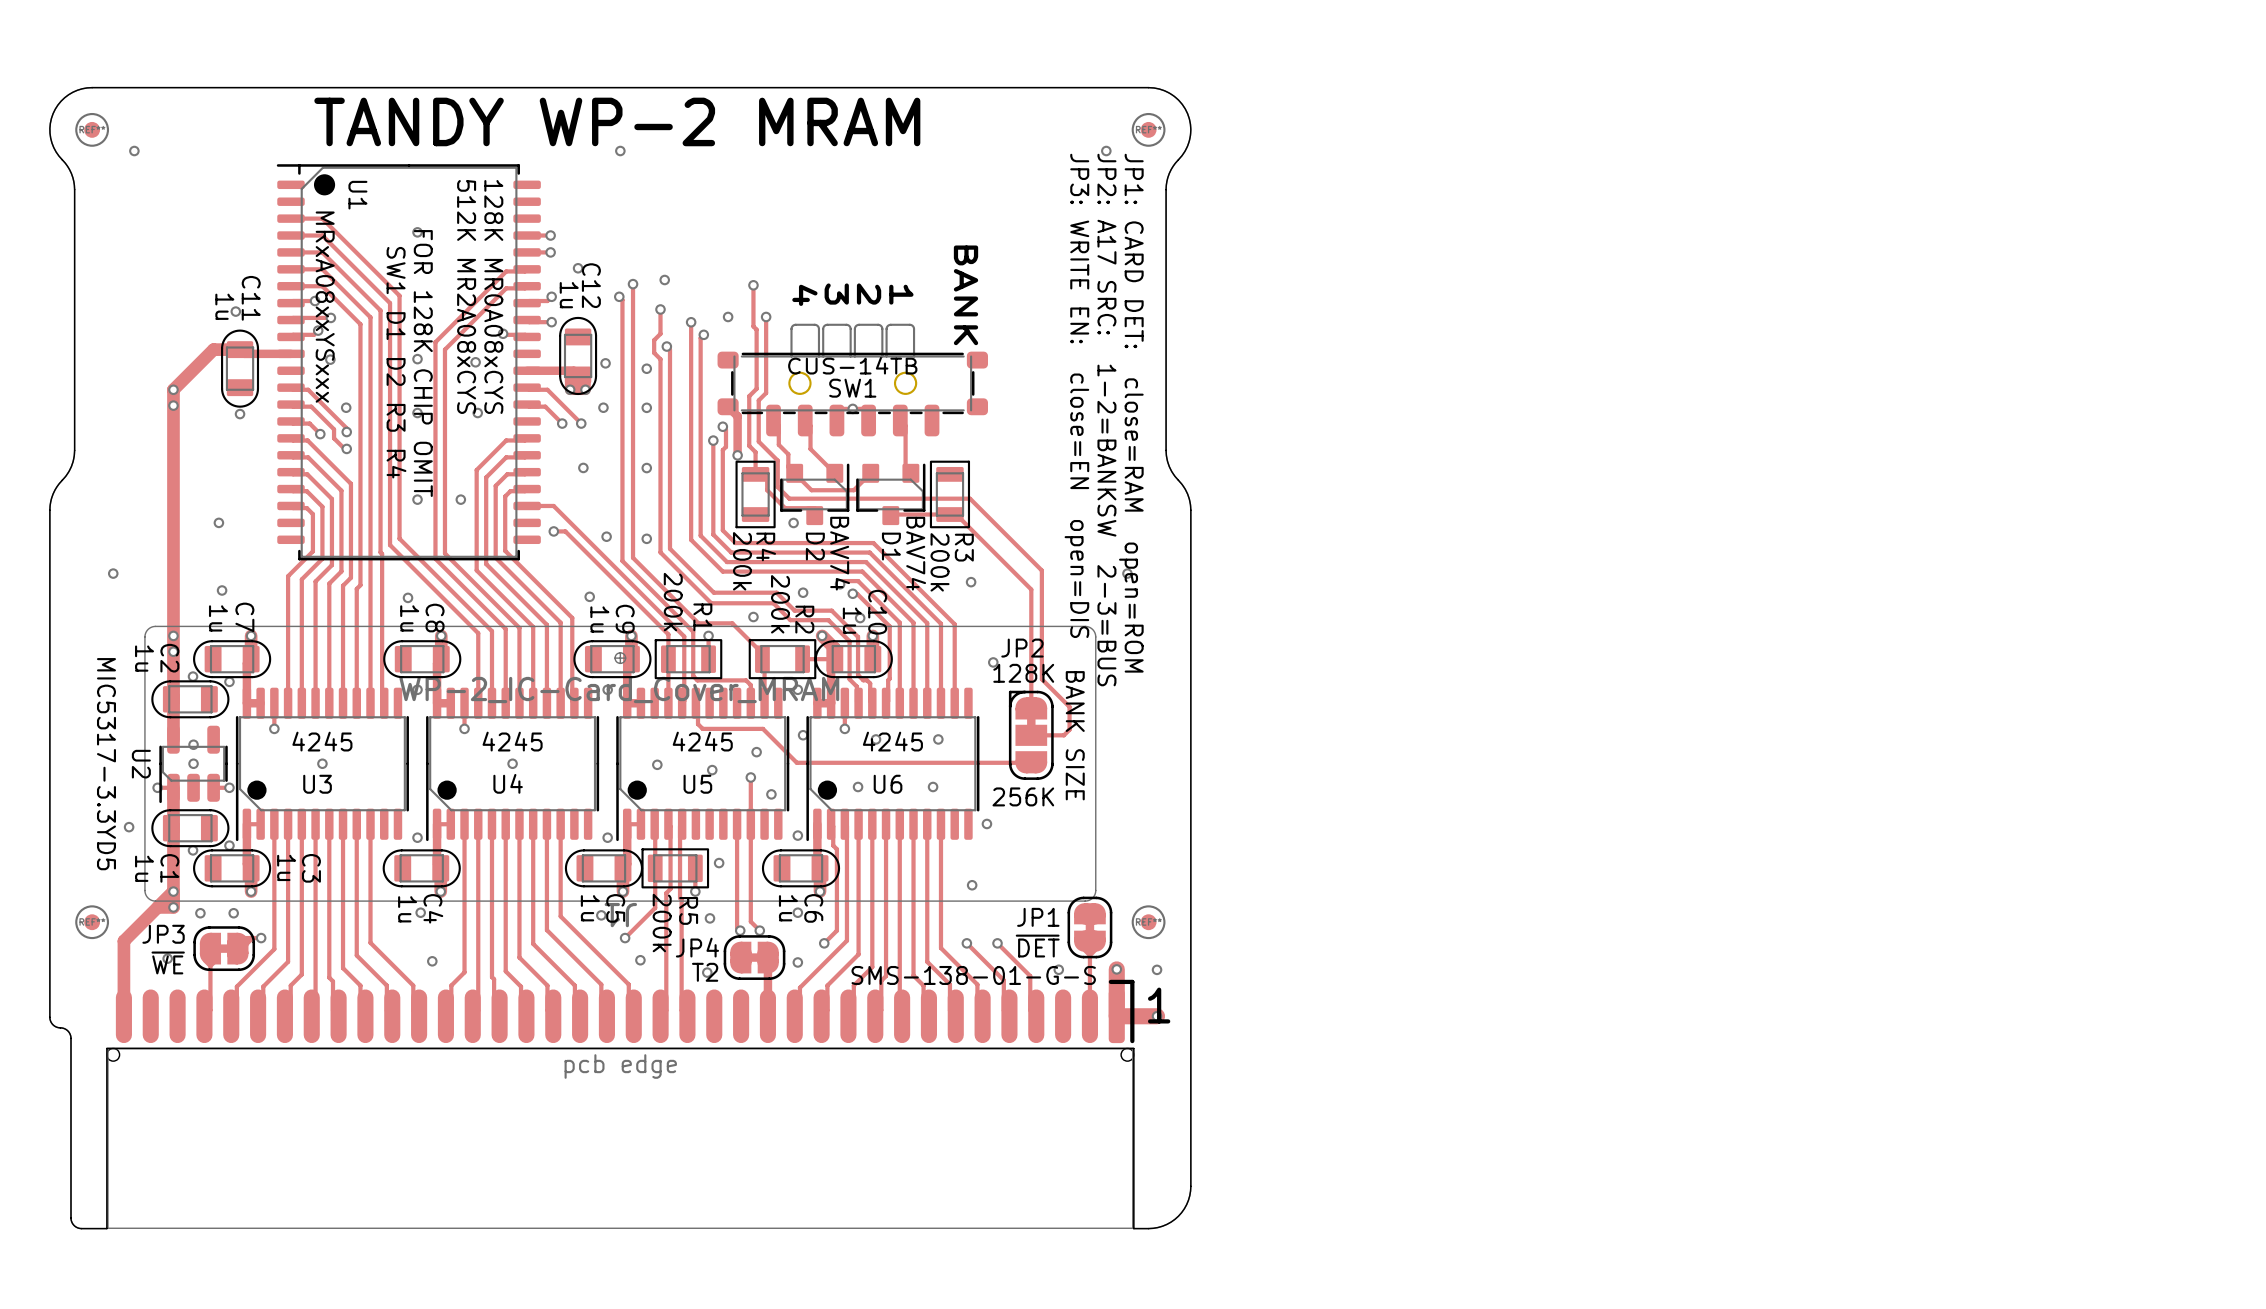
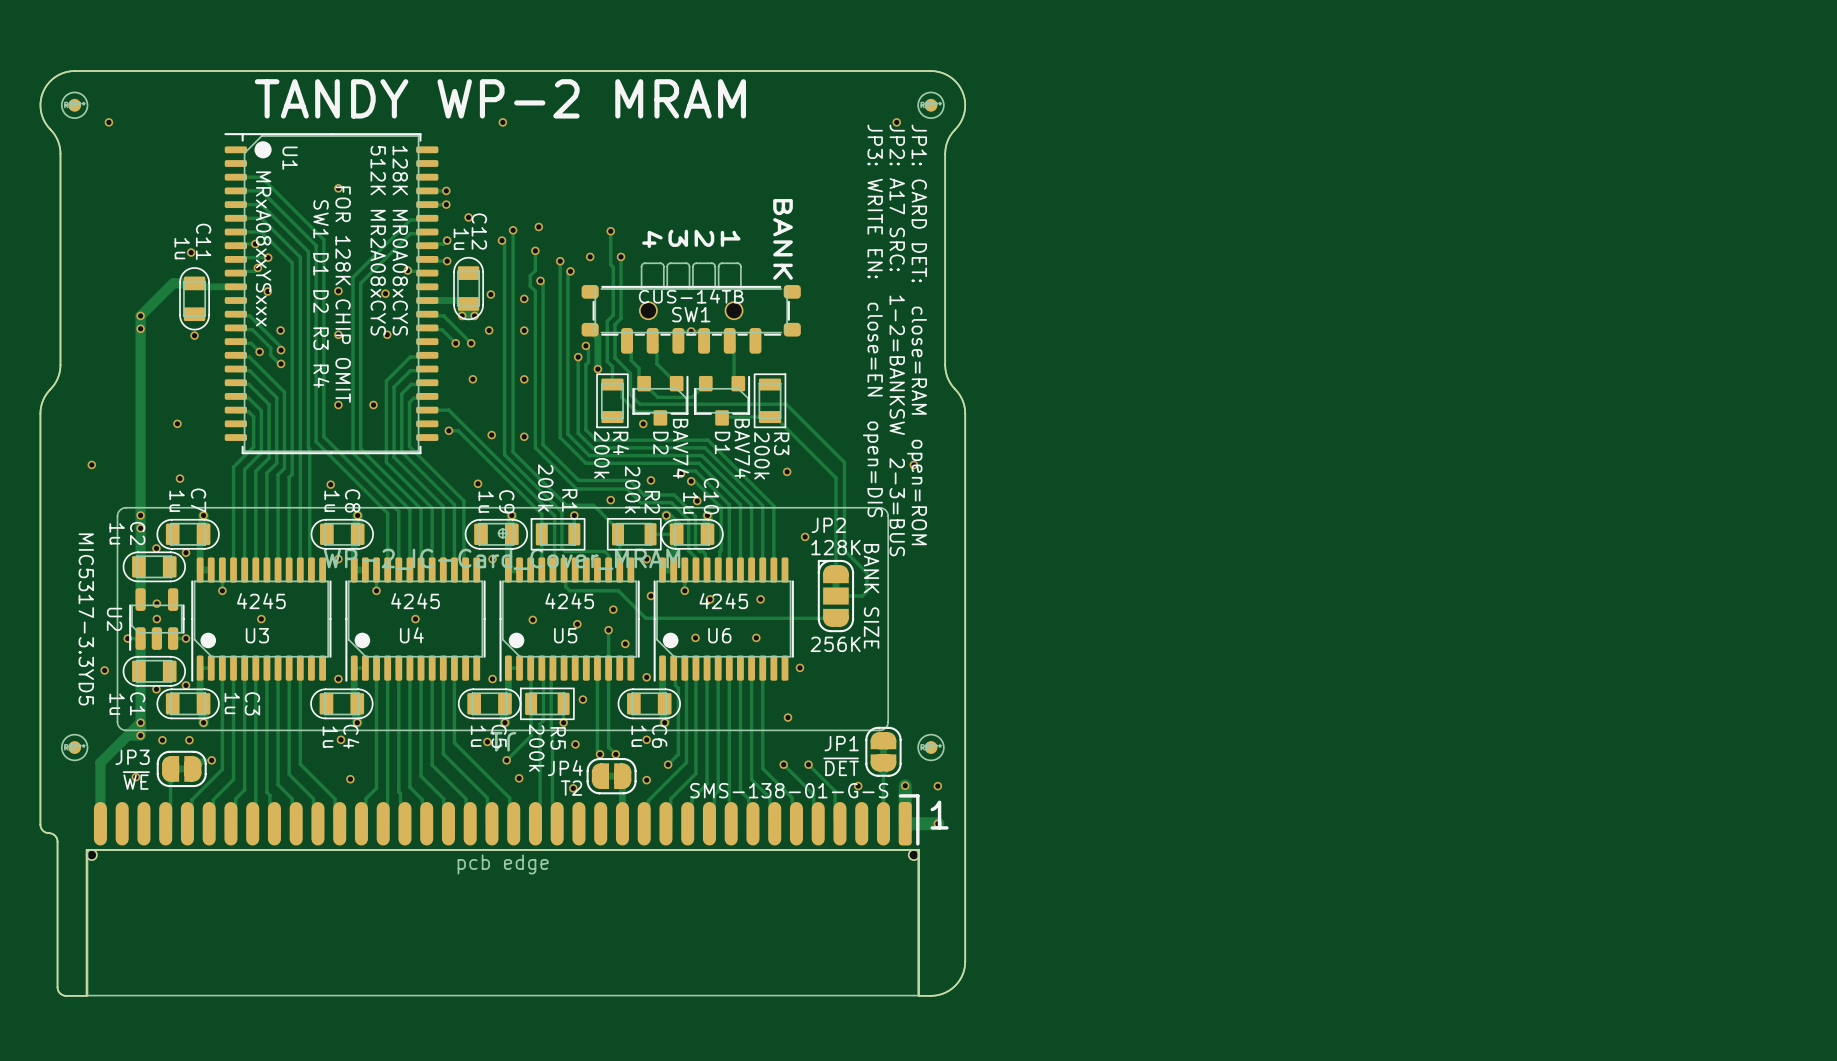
JP2 text: 128K (1023, 673) -> none
JP2 text: none -> 128K (835, 547)
JP2 text: none -> 256K (835, 644)
JP2 text: 256K (1023, 796) -> none

